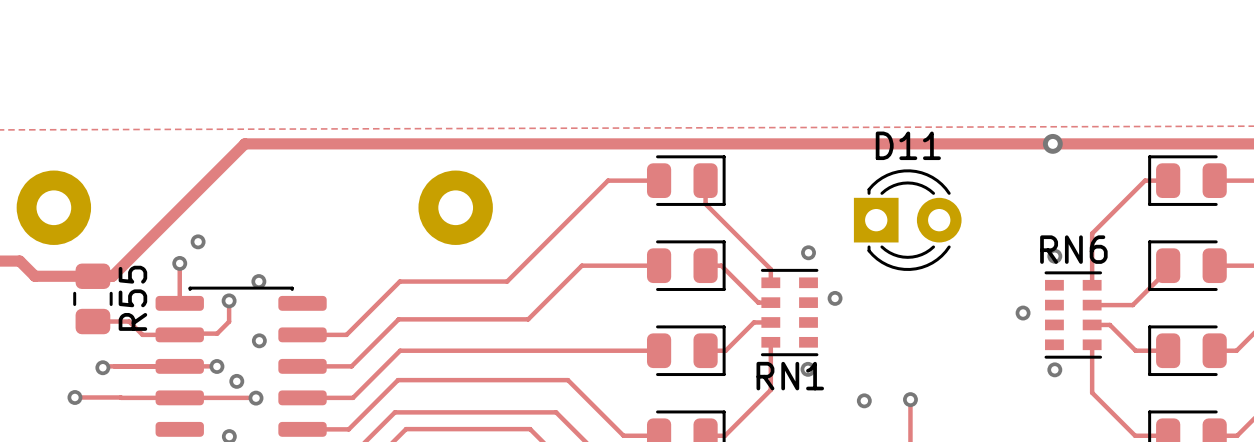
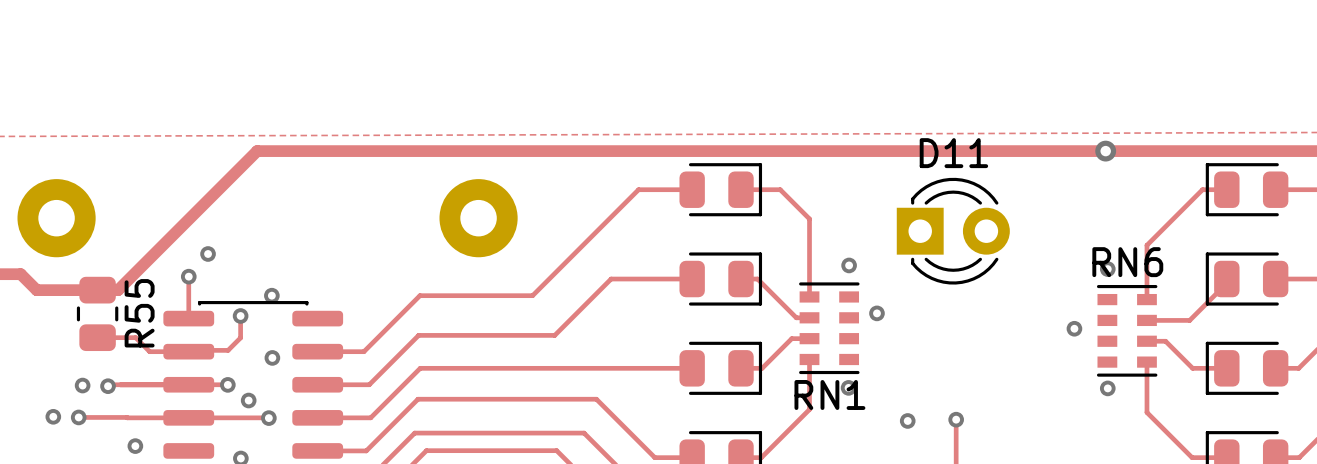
track: (705, 180) (705, 204) (770, 269) -> (741, 189) (780, 189) (809, 218) (809, 282)
via: none -> (82, 385)
via: none -> (53, 416)
via: none -> (135, 446)

